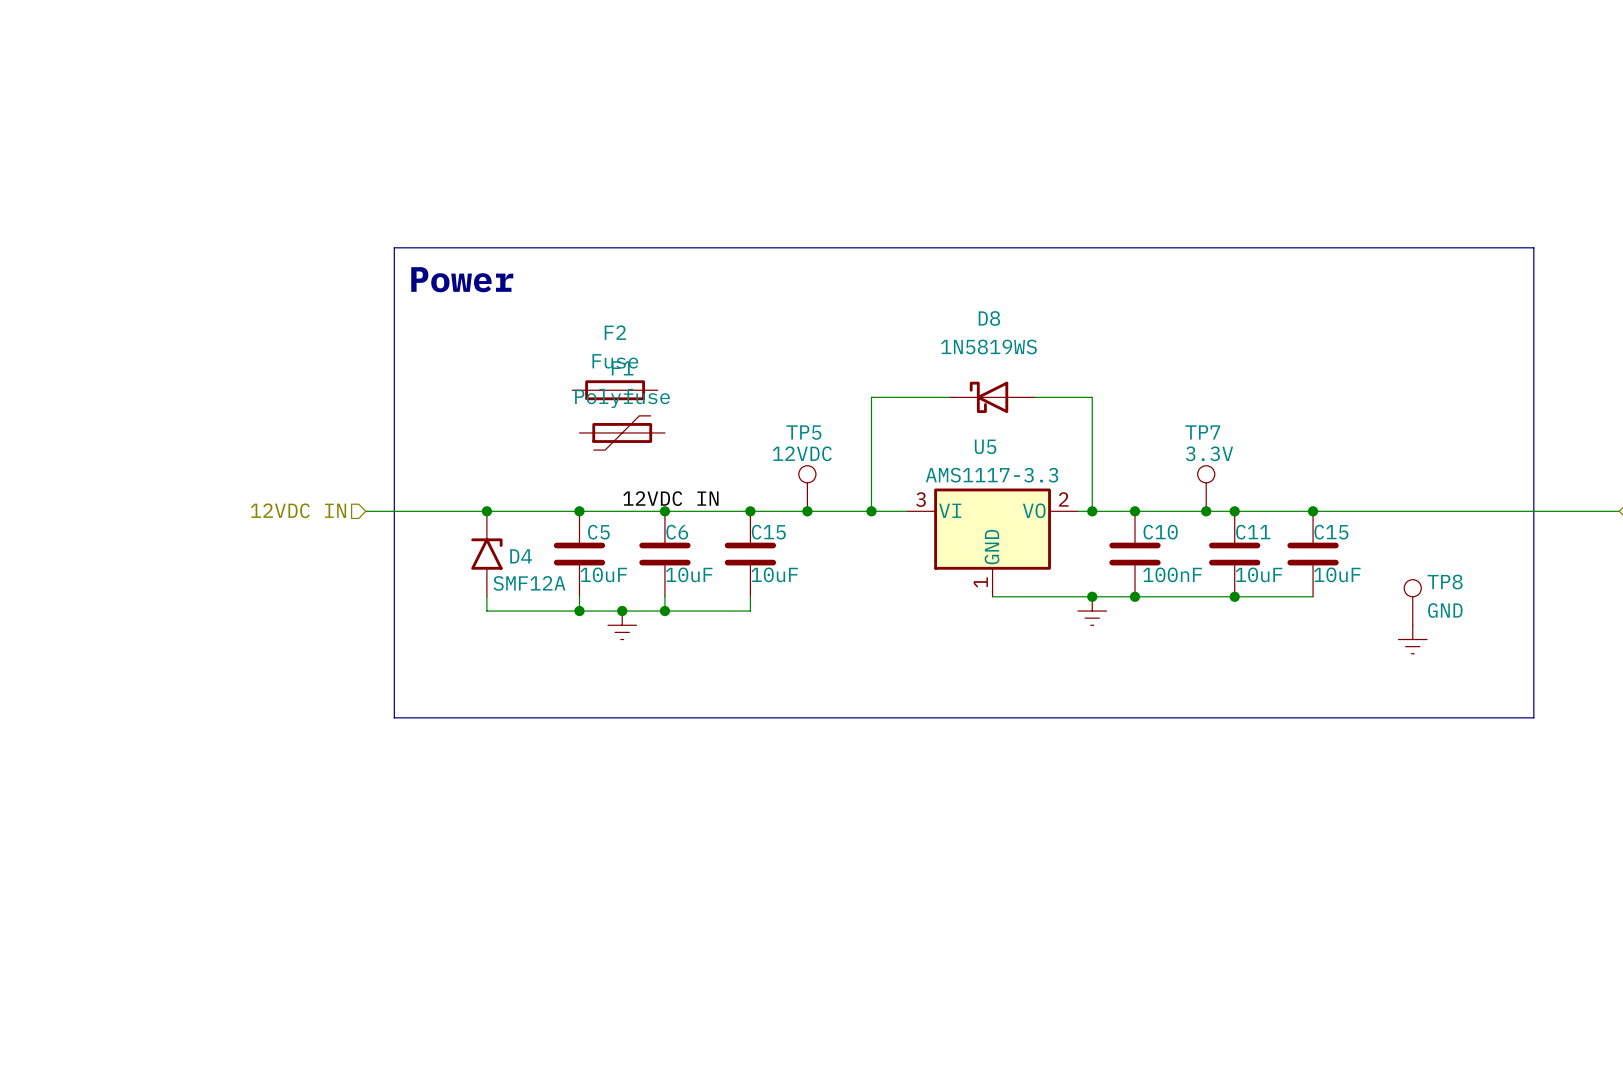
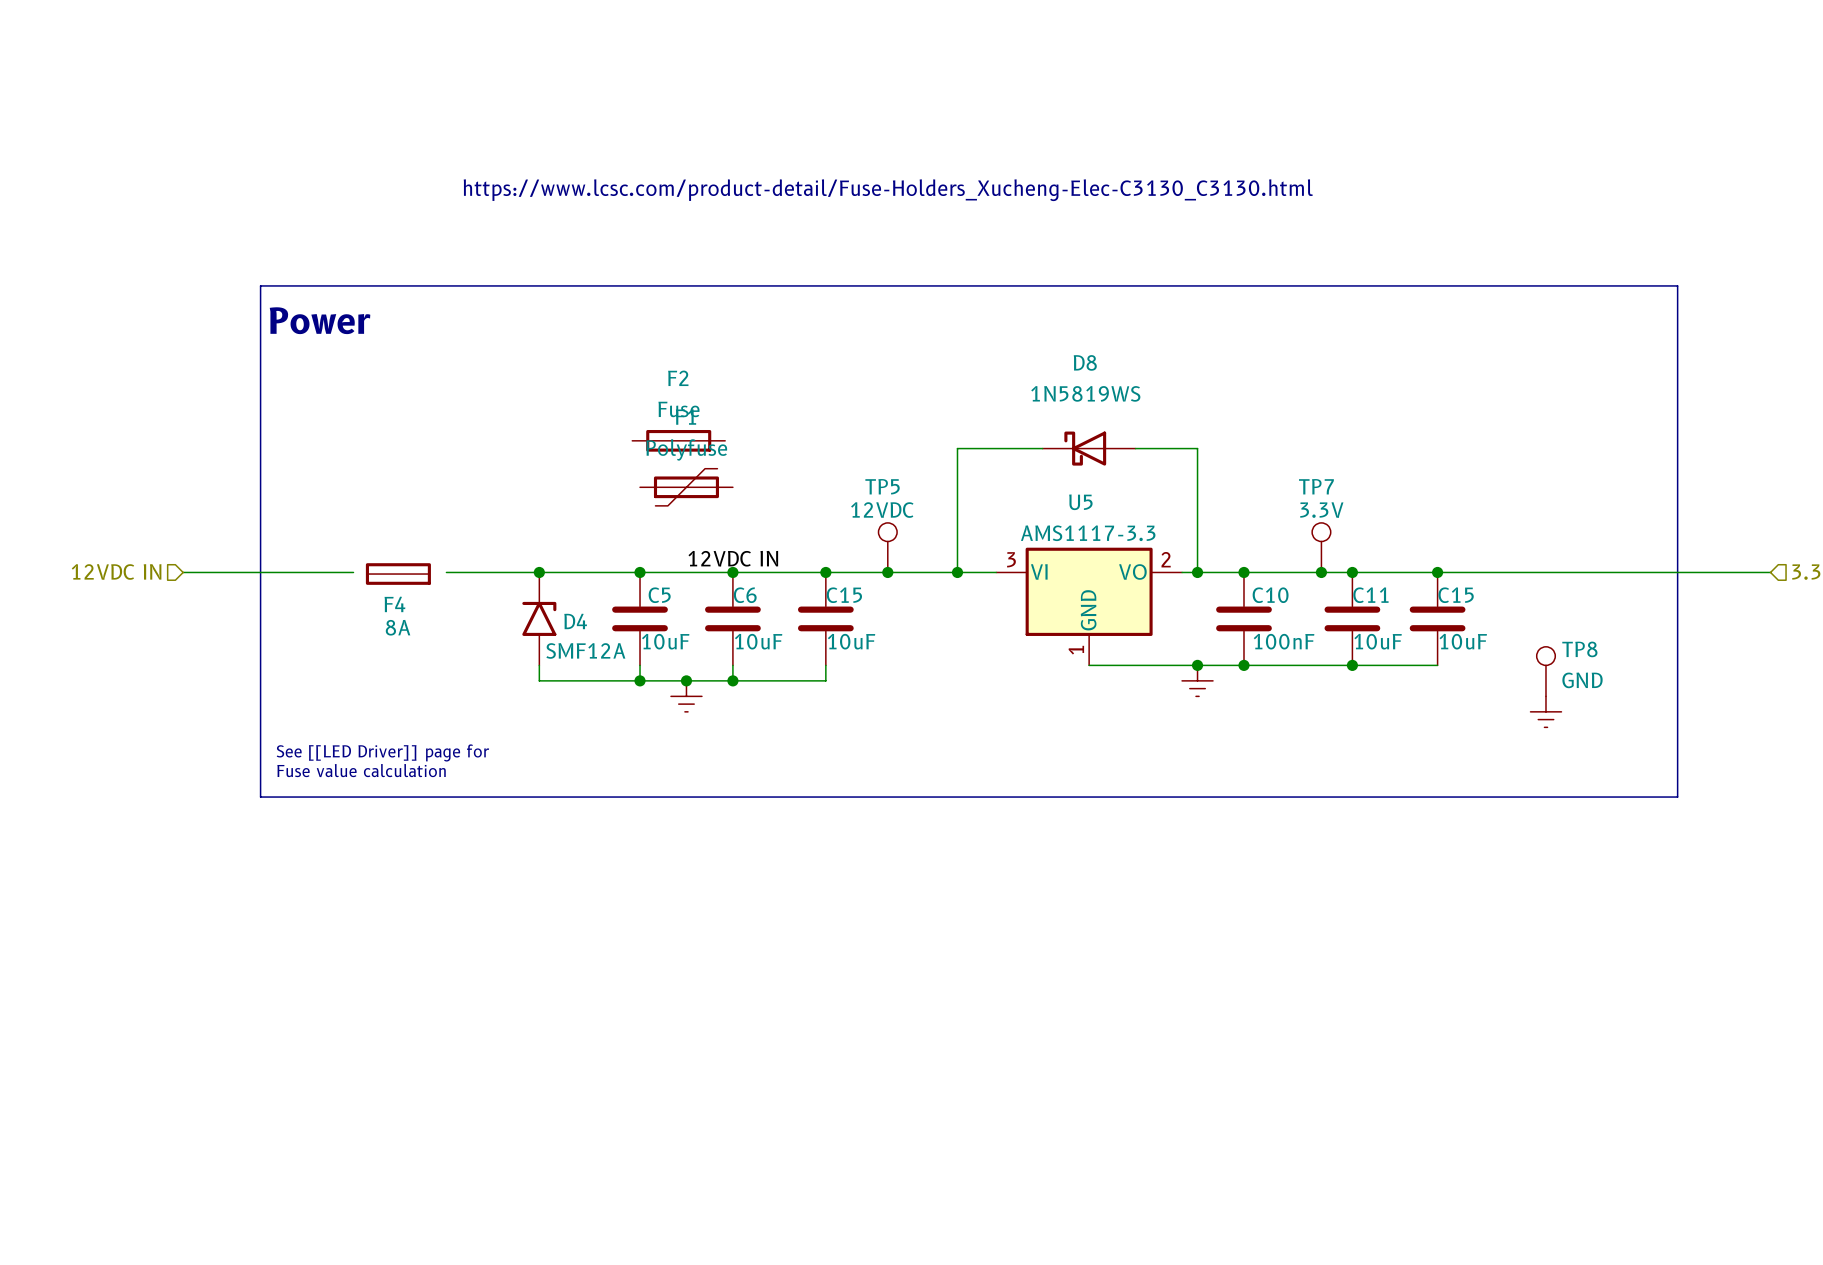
text: none -> https://www.lcsc.com/product-detail/Fuse-Holders_Xucheng-Elec-C3130_C3130.html (888, 190)
line: (394, 247) (394, 717) -> (438, 285) (260, 285) (260, 797) (438, 797)
text position: Power (462, 279) -> Power (320, 320)
hierarchical label position: 12VDC IN (298, 510) -> 12VDC IN (116, 571)
wire: none -> (183, 572) (353, 572)
wire: (365, 511) (401, 511) -> none
F4: none -> 8A (398, 574)
text: none -> See [[LED Driver]] page for (382, 752)
text: none -> Fuse value calculation (361, 770)

